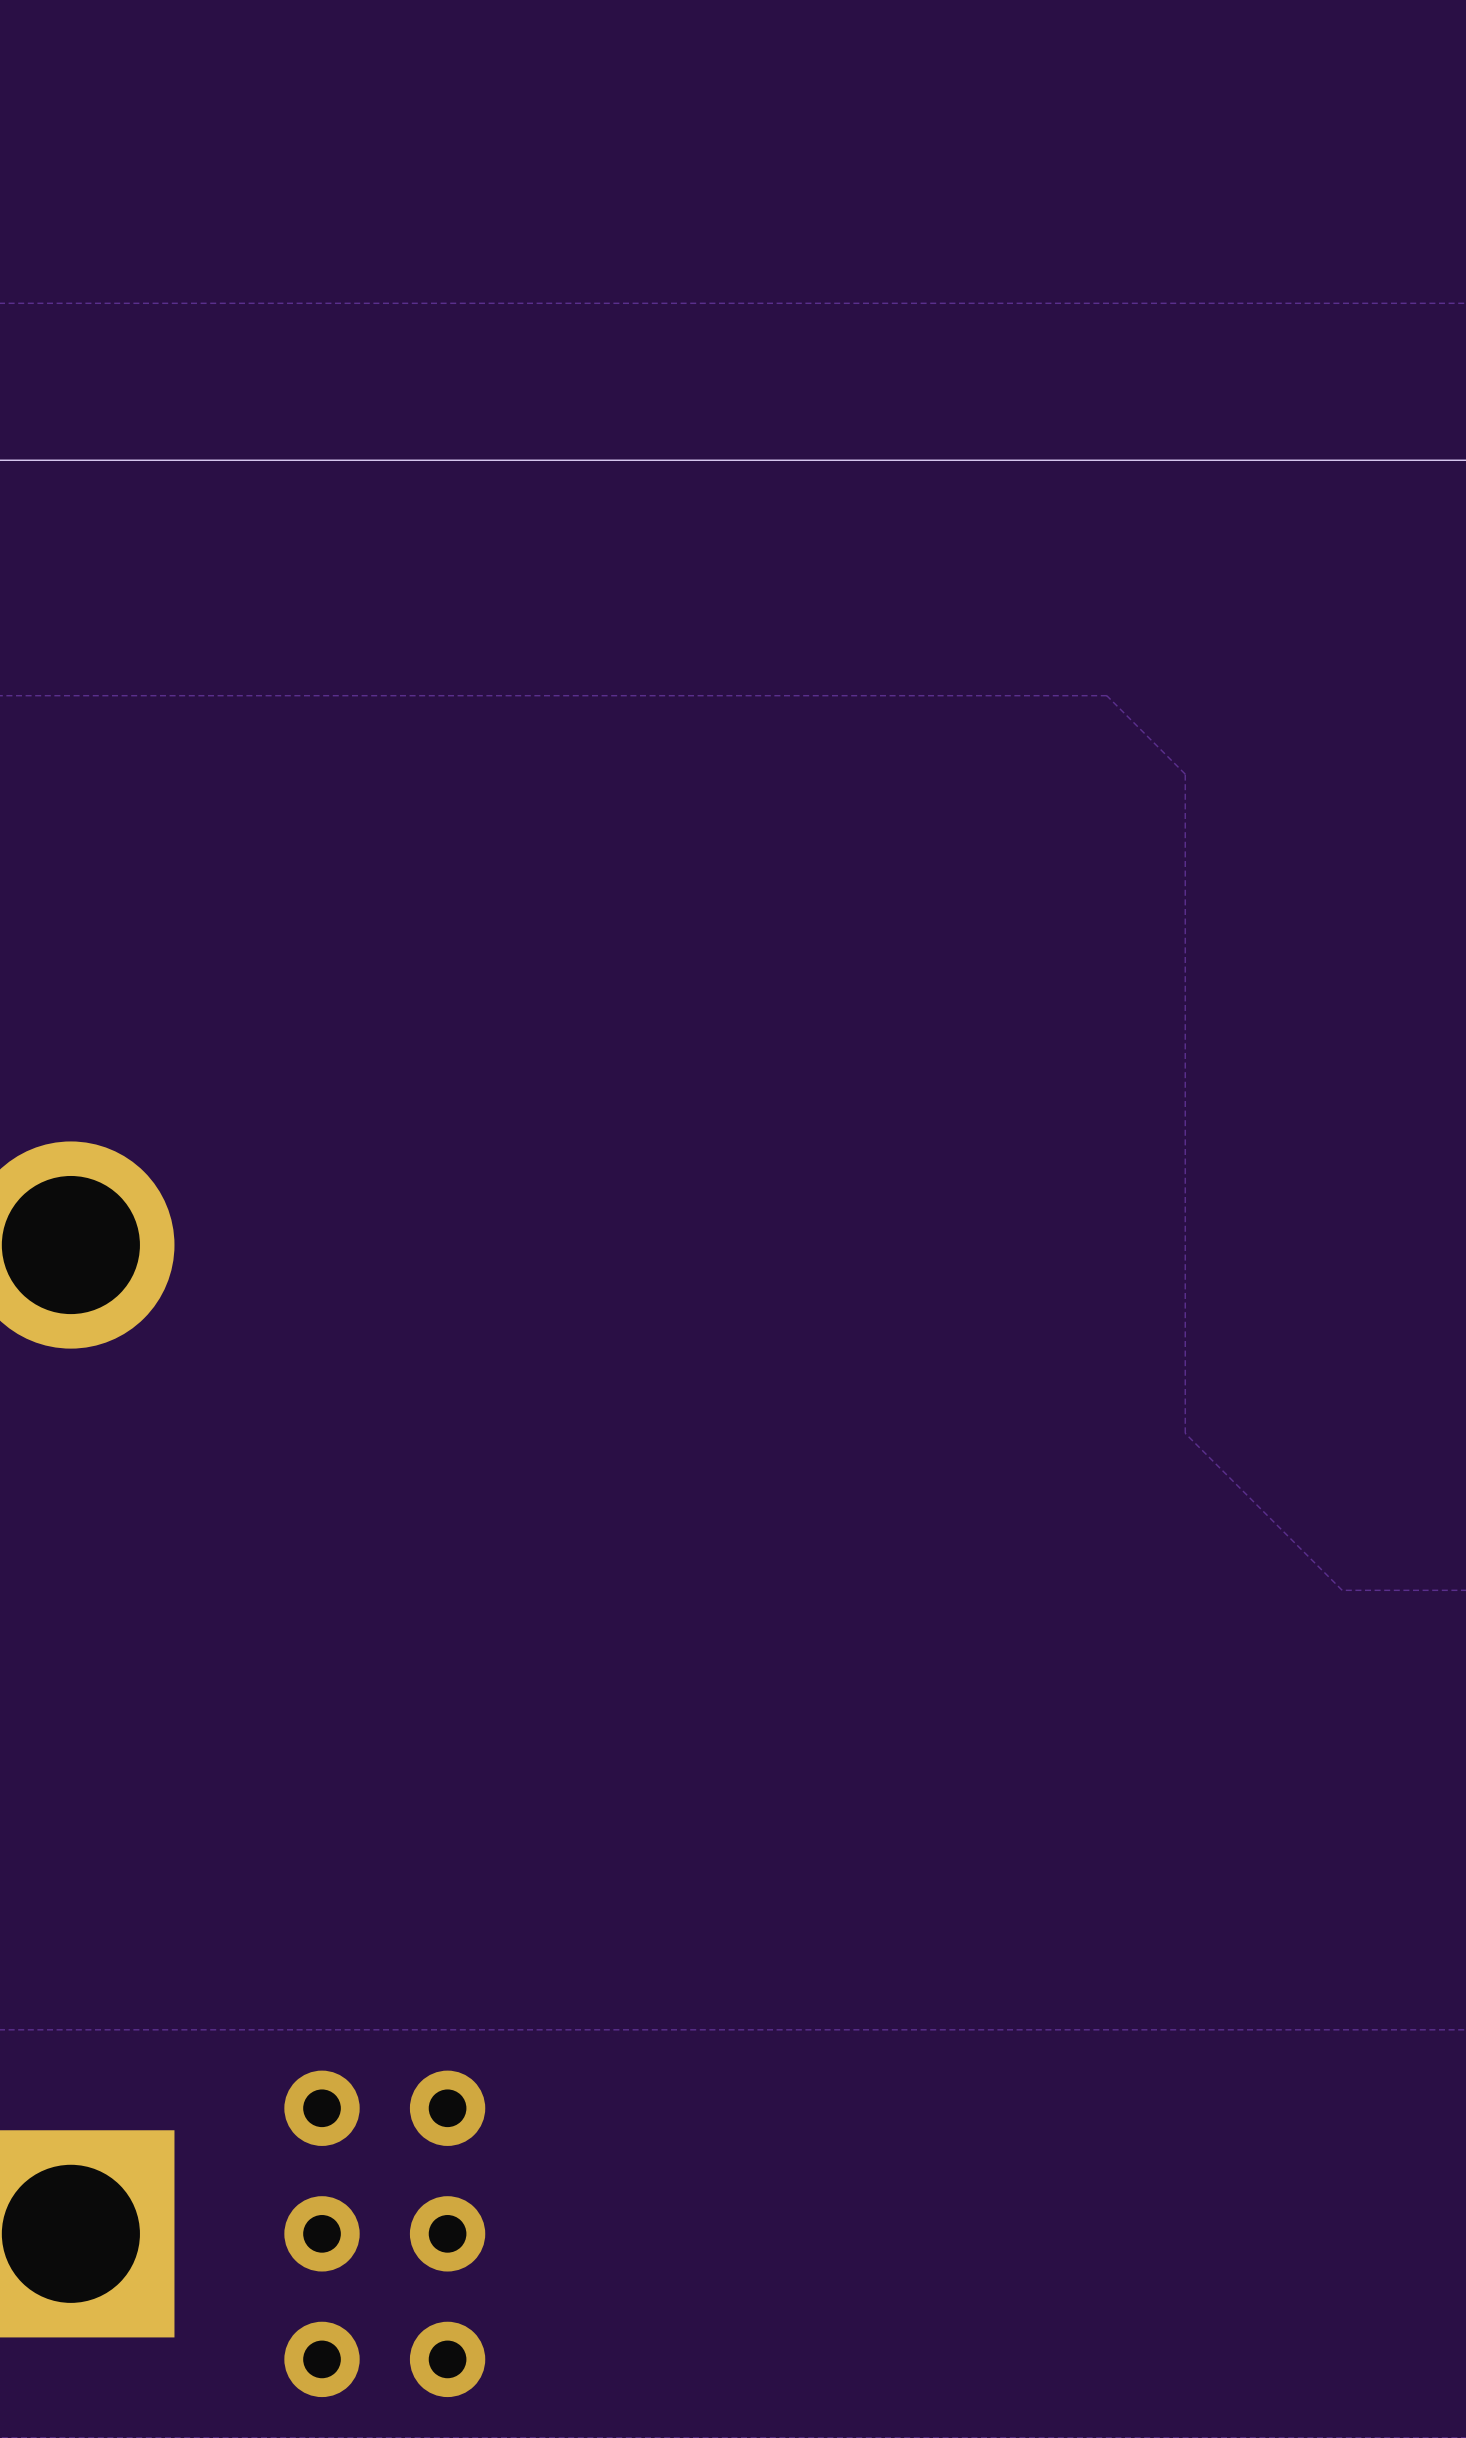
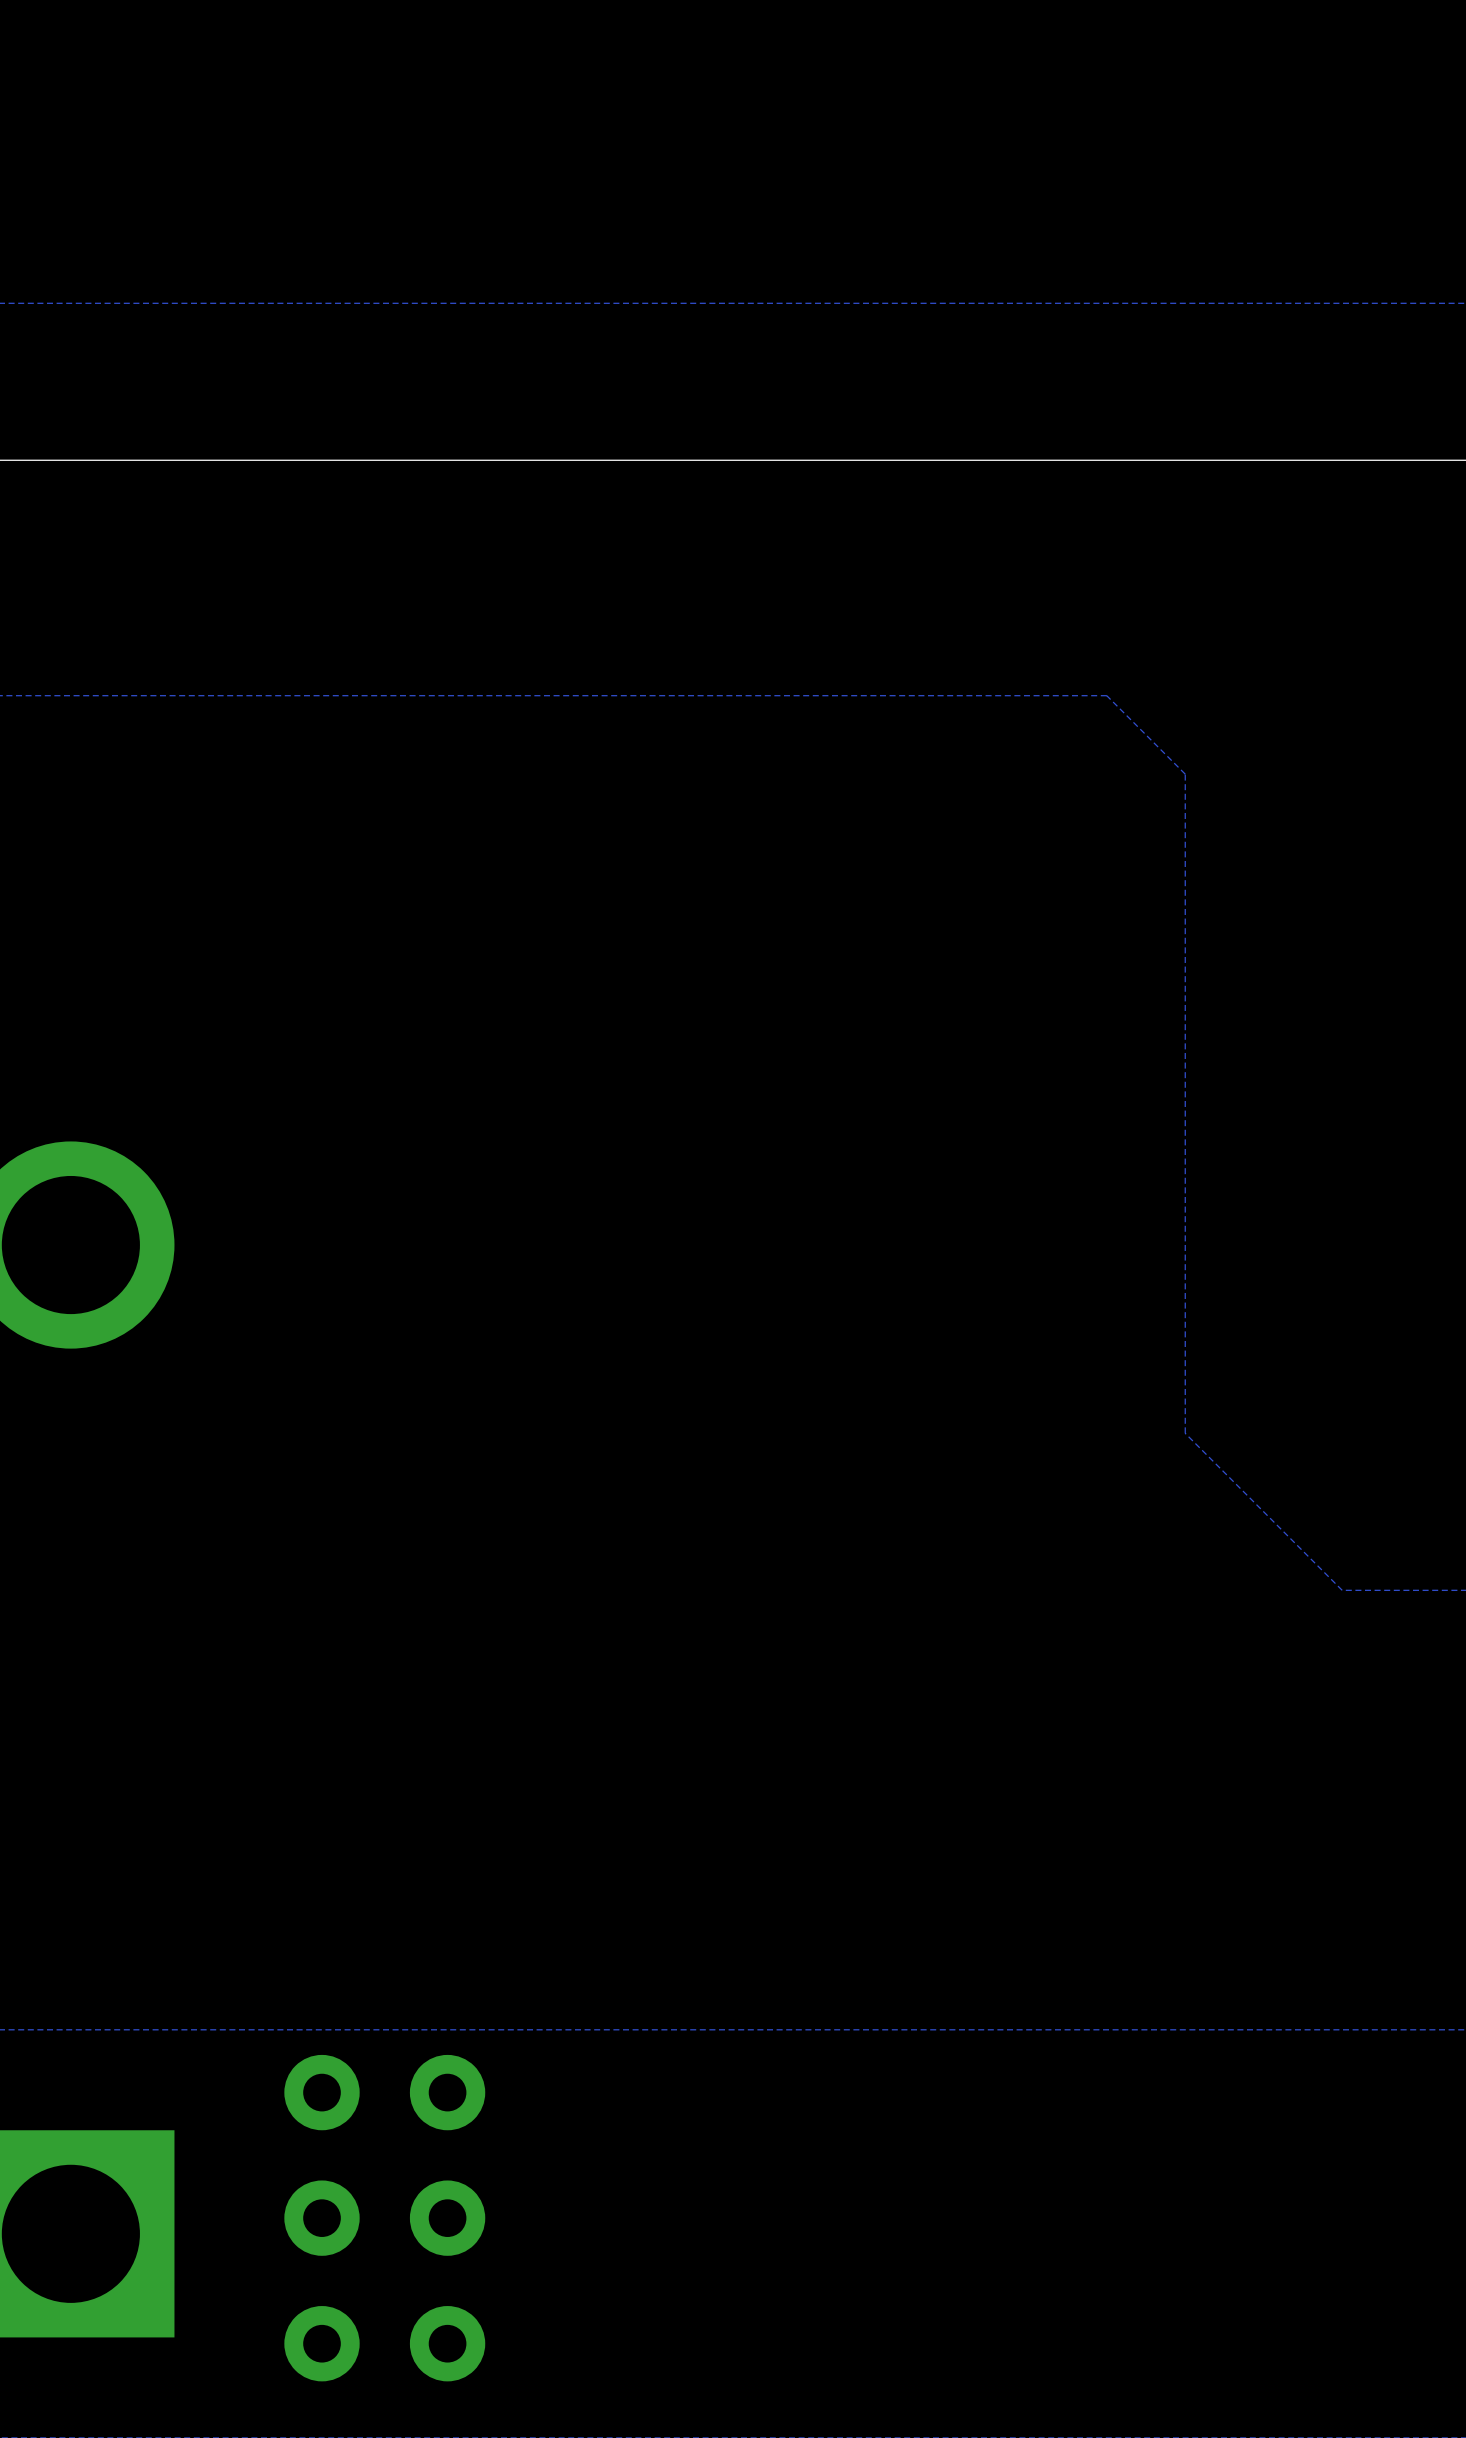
via position: (322, 2108) -> (322, 2092)
via position: (447, 2108) -> (447, 2092)
via position: (322, 2233) -> (322, 2218)
via position: (447, 2233) -> (447, 2218)
via position: (322, 2359) -> (322, 2343)
via position: (447, 2359) -> (447, 2343)

